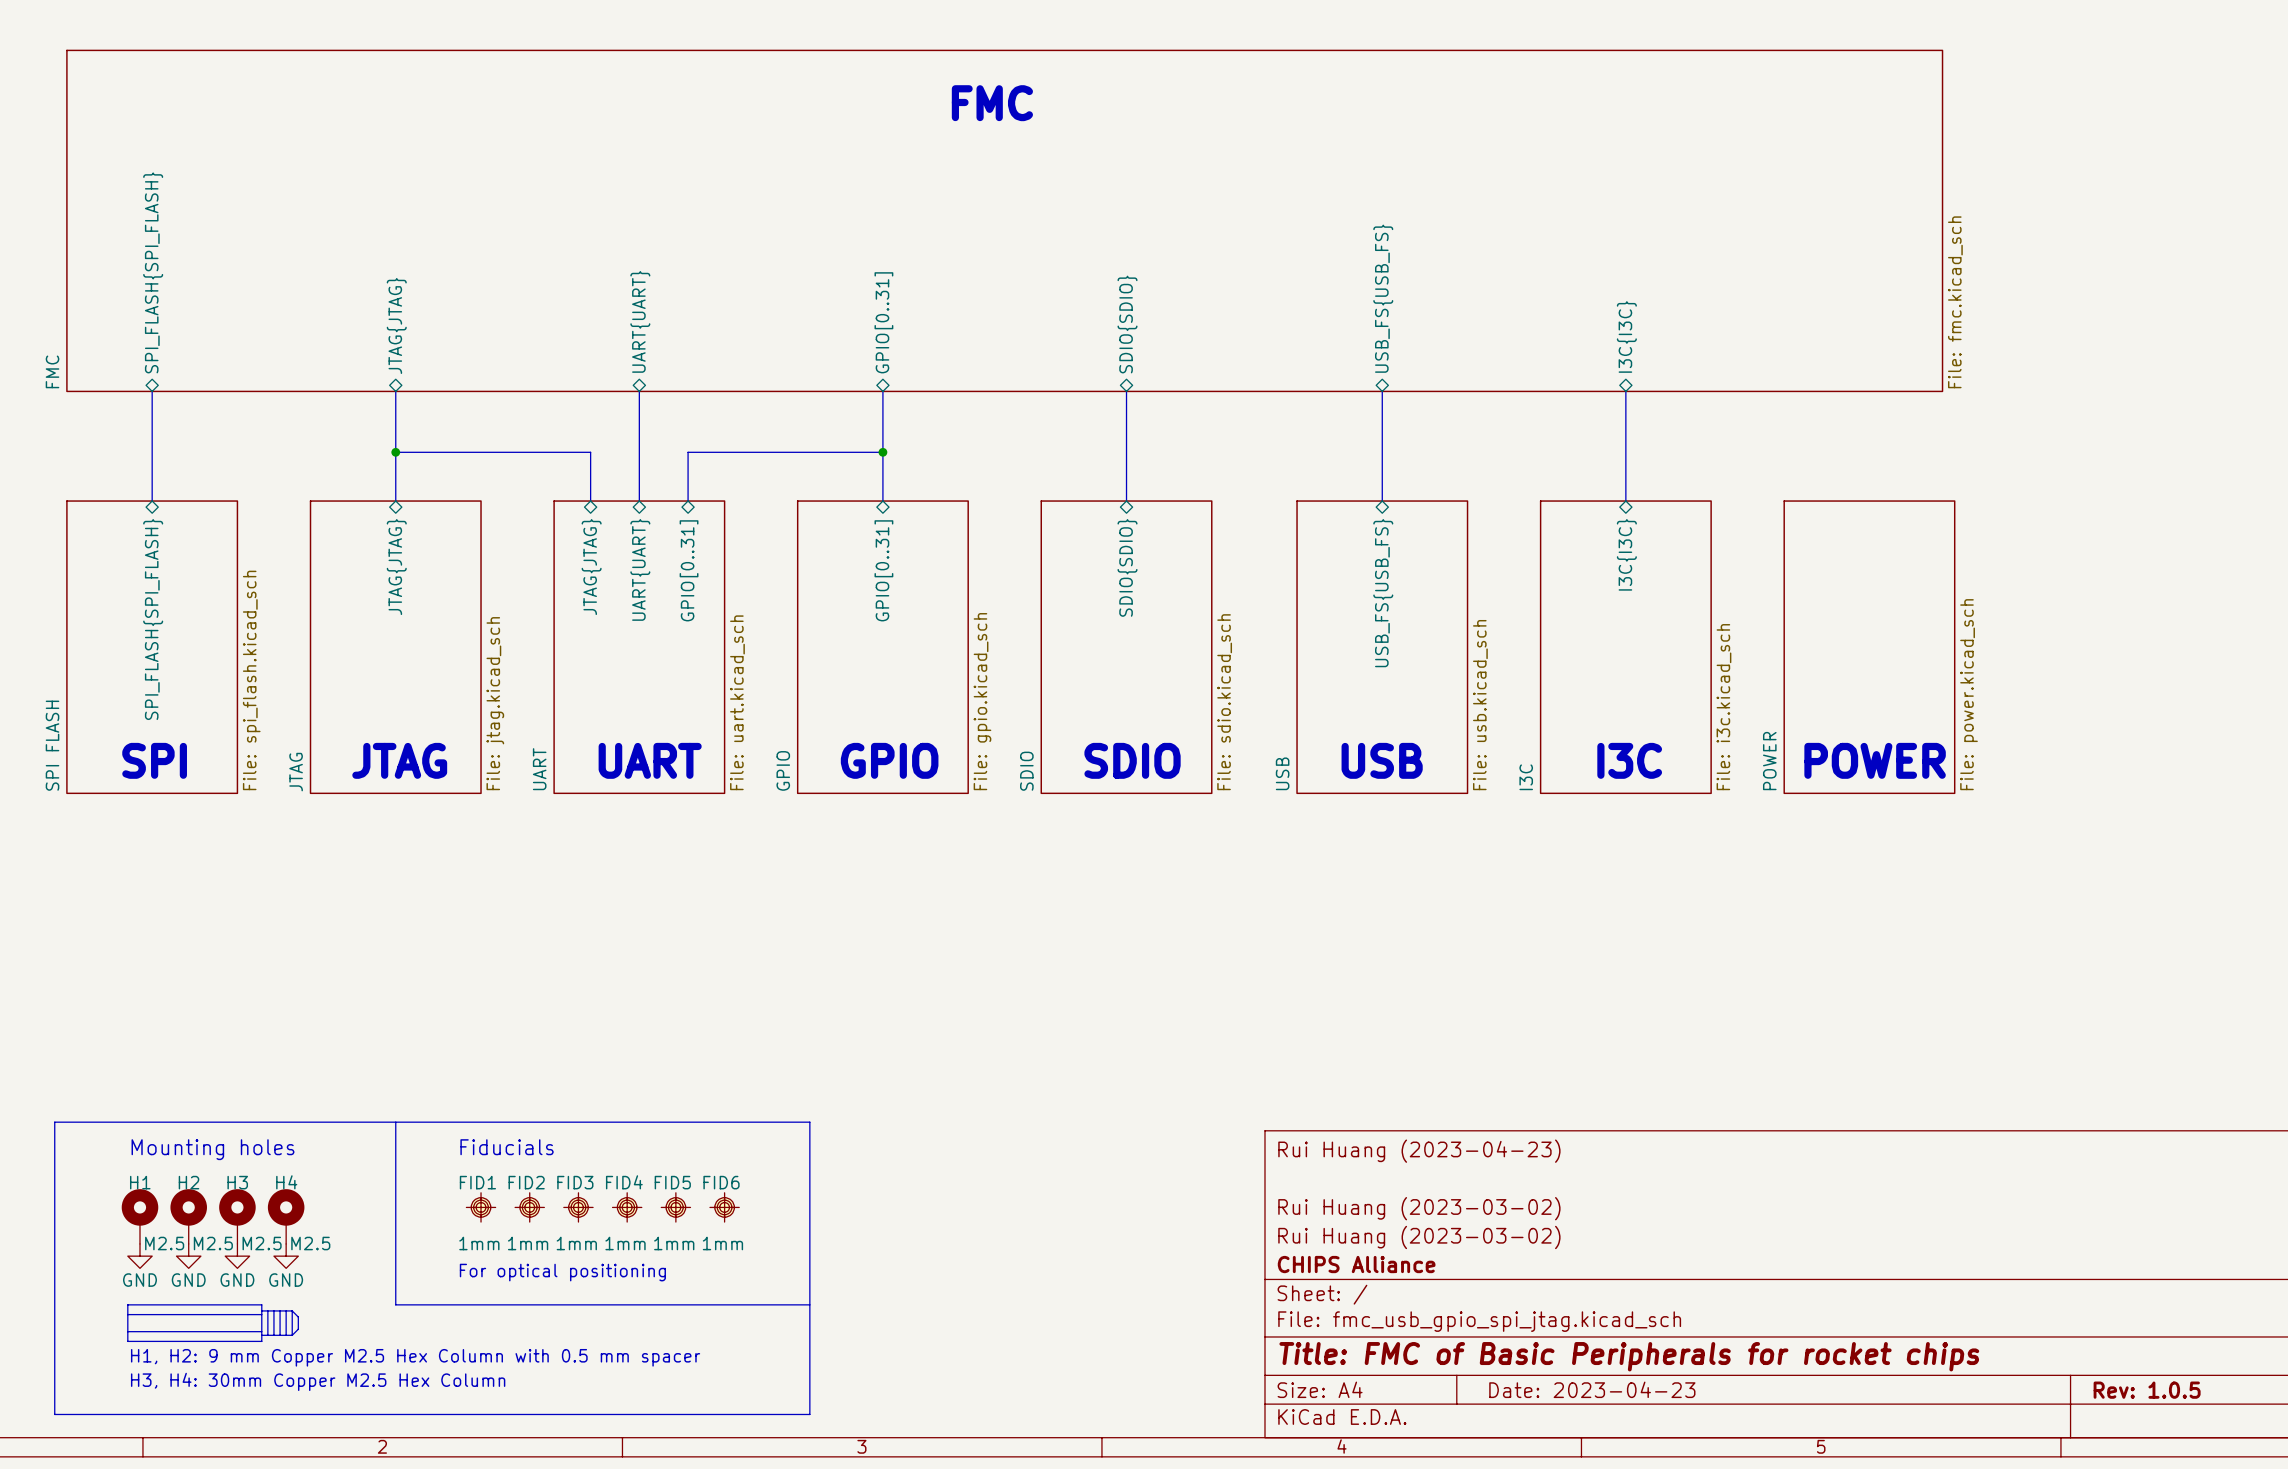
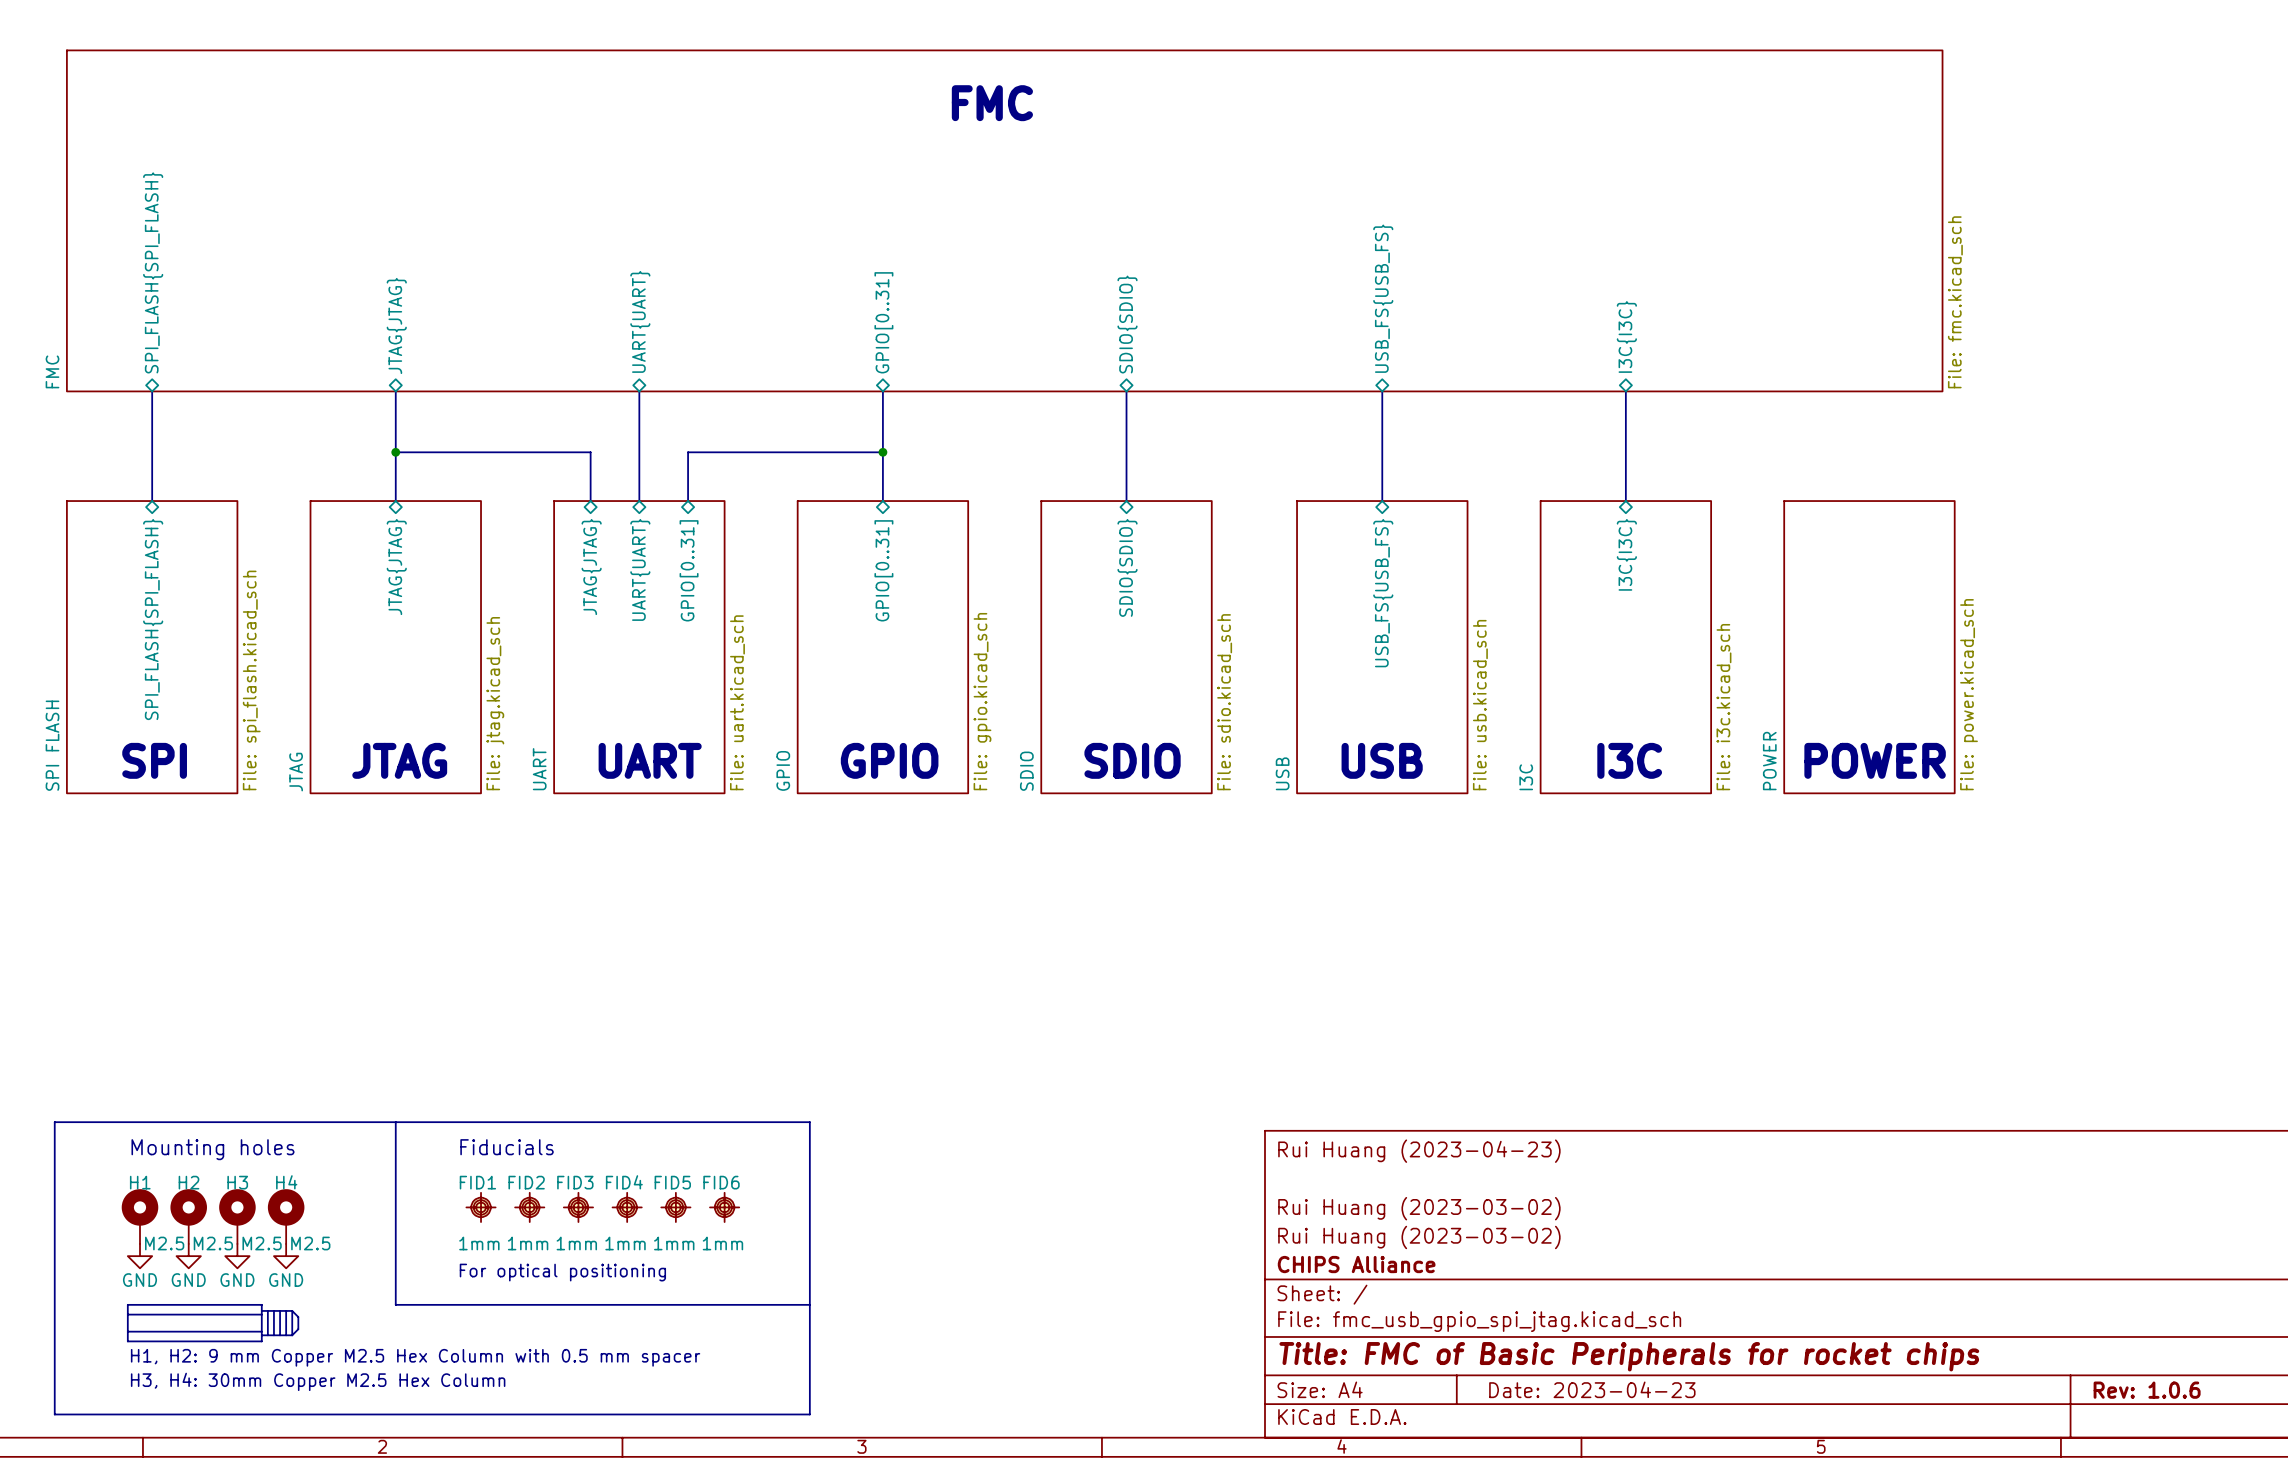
title block: Rev: 1.0.5 (2147, 1390) -> Rev: 1.0.6 (2147, 1390)

